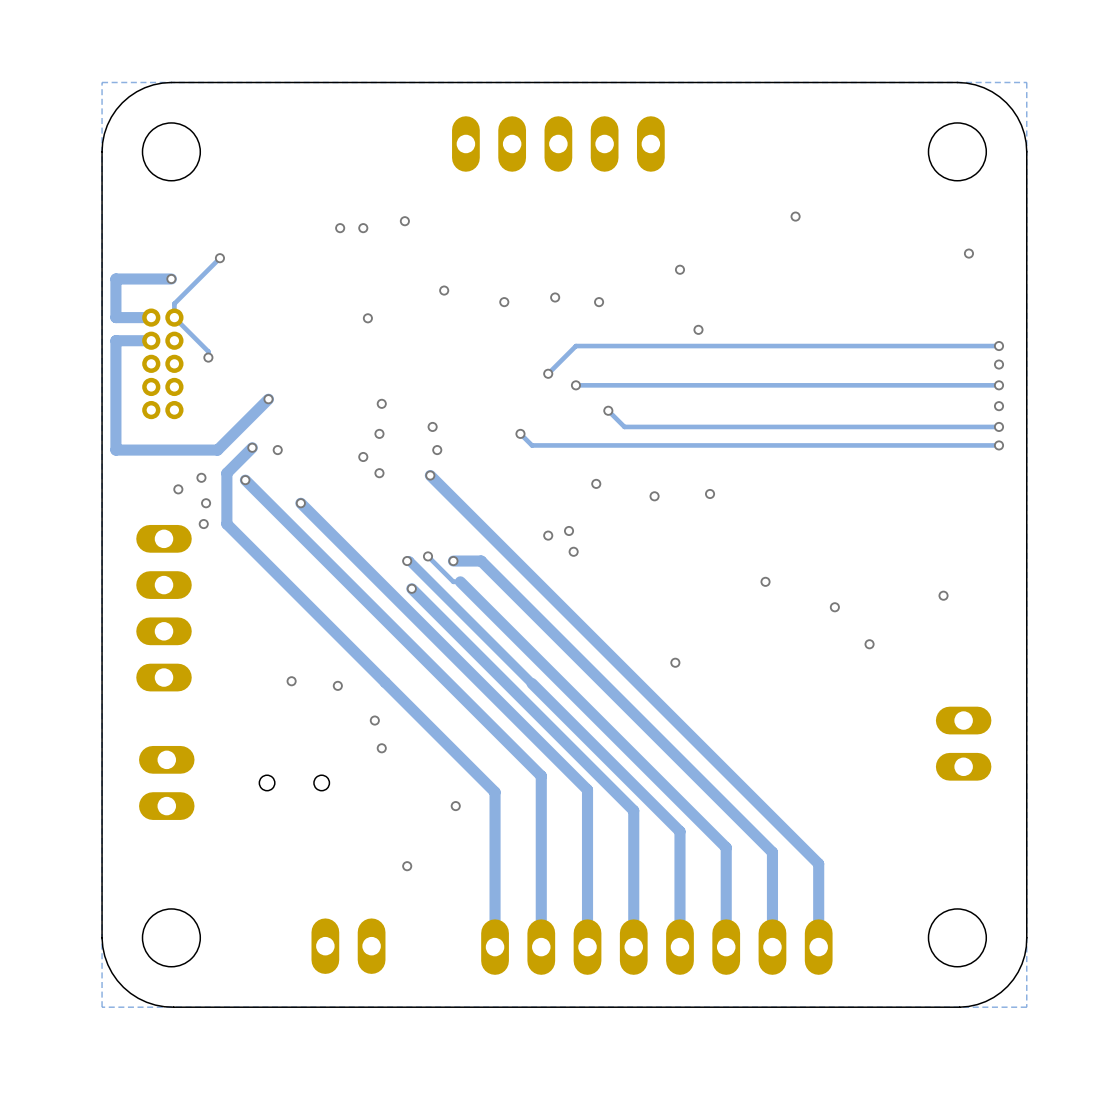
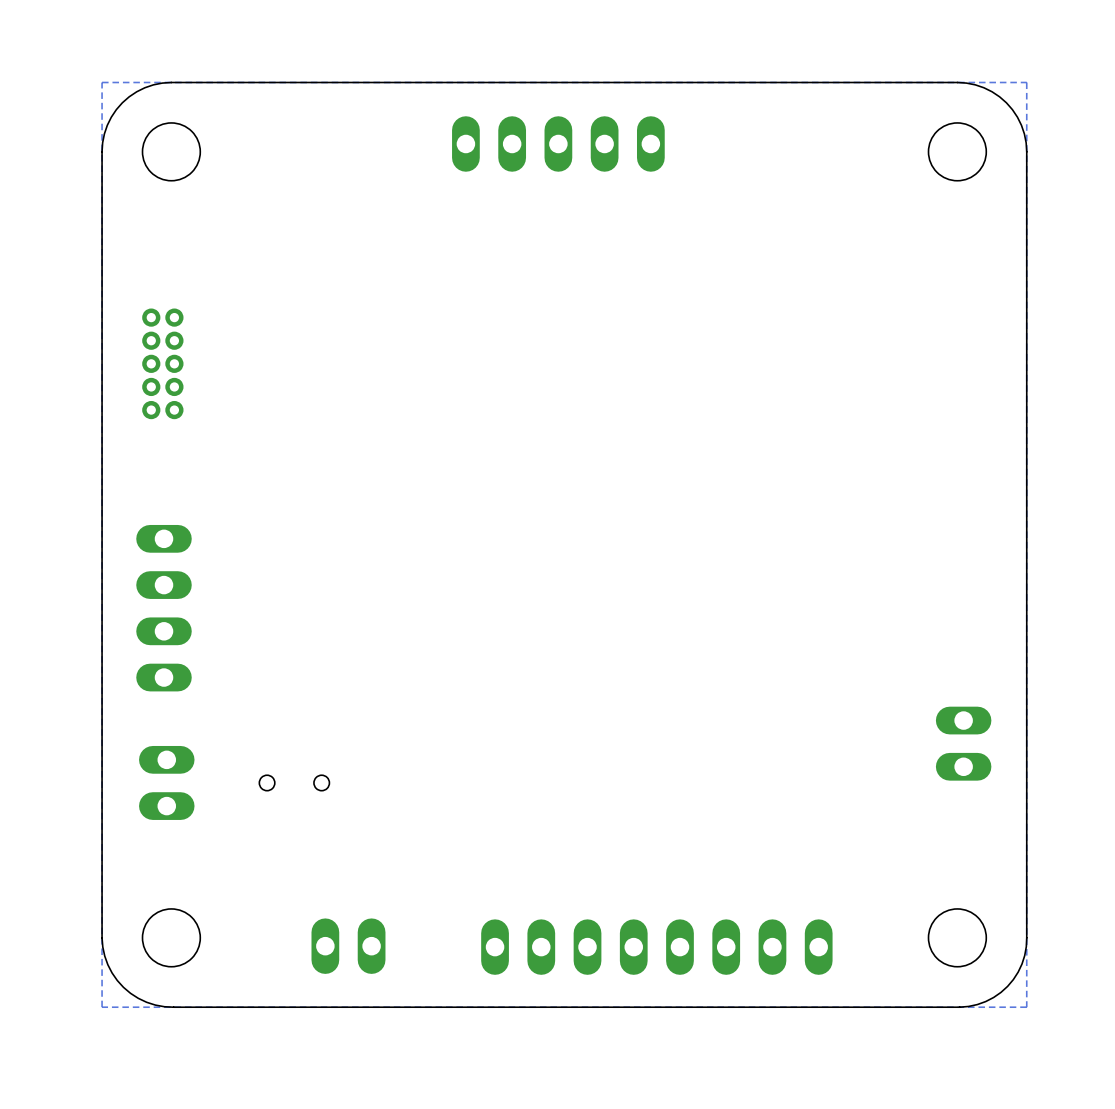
via: (795, 216) -> none
via: (404, 221) -> none
via: (340, 228) -> none
via: (363, 228) -> none
via: (968, 253) -> none
track: (219, 258) (174, 303) (174, 317) (208, 351) (208, 357) -> none
via: (219, 258) -> none
via: (679, 269) -> none
track: (171, 279) (115, 279) (115, 317) (151, 317) -> none
via: (171, 279) -> none
via: (444, 290) -> none
via: (555, 297) -> none
via: (504, 302) -> none
via: (599, 302) -> none
via: (367, 318) -> none
via: (698, 329) -> none
track: (151, 340) (115, 340) (115, 450) (217, 450) (268, 399) -> none
track: (999, 346) (575, 346) (548, 373) -> none
via: (999, 346) -> none
via: (208, 357) -> none
via: (999, 364) -> none
via: (548, 373) -> none
via: (575, 385) -> none
track: (999, 385) (575, 385) -> none
via: (999, 385) -> none
via: (268, 399) -> none
via: (381, 403) -> none
via: (999, 406) -> none
track: (608, 410) (624, 426) (999, 426) -> none
via: (608, 410) -> none
via: (432, 426) -> none
via: (999, 426) -> none
via: (379, 433) -> none
track: (520, 433) (532, 445) (999, 445) -> none
via: (520, 433) -> none
via: (999, 445) -> none
track: (252, 447) (226, 473) (226, 524) (495, 792) (495, 947) -> none
via: (252, 447) -> none
via: (277, 450) -> none
via: (437, 450) -> none
via: (363, 457) -> none
via: (379, 473) -> none
track: (430, 475) (818, 863) (818, 947) -> none
via: (430, 475) -> none
via: (201, 477) -> none
track: (245, 480) (541, 776) (541, 947) -> none
via: (245, 480) -> none
via: (596, 483) -> none
via: (178, 489) -> none
via: (710, 493) -> none
via: (654, 496) -> none
via: (206, 503) -> none
track: (300, 503) (587, 789) (587, 947) -> none
via: (300, 503) -> none
via: (203, 524) -> none
via: (569, 530) -> none
via: (548, 535) -> none
via: (573, 551) -> none
track: (428, 556) (453, 581) (460, 581) (726, 847) (726, 947) -> none
via: (428, 556) -> none
track: (407, 561) (409, 561) (679, 831) (679, 947) -> none
via: (407, 561) -> none
track: (453, 561) (481, 561) (772, 852) (772, 947) -> none
via: (453, 561) -> none
via: (765, 581) -> none
track: (411, 588) (633, 810) (633, 947) -> none
via: (411, 588) -> none
via: (943, 595) -> none
via: (834, 607) -> none
via: (869, 644) -> none
via: (675, 662) -> none
via: (291, 681) -> none
via: (337, 685) -> none
via: (374, 720) -> none
via: (381, 748) -> none
via: (455, 806) -> none
via: (407, 866) -> none

